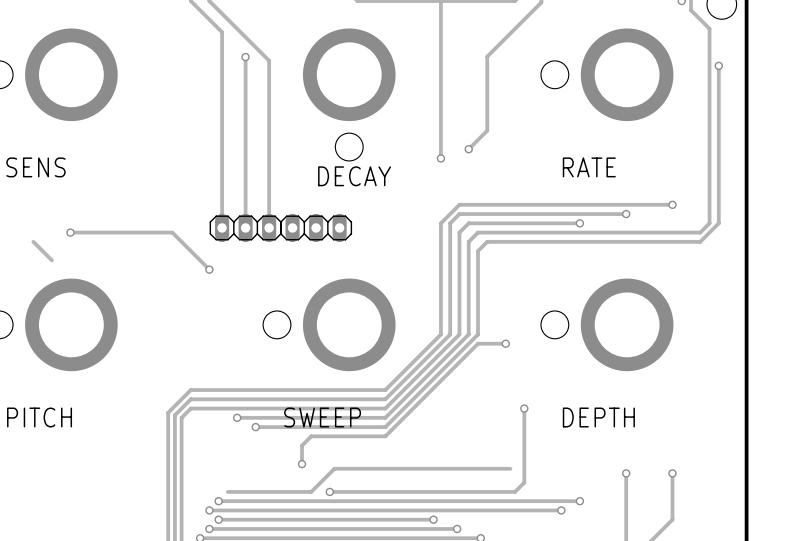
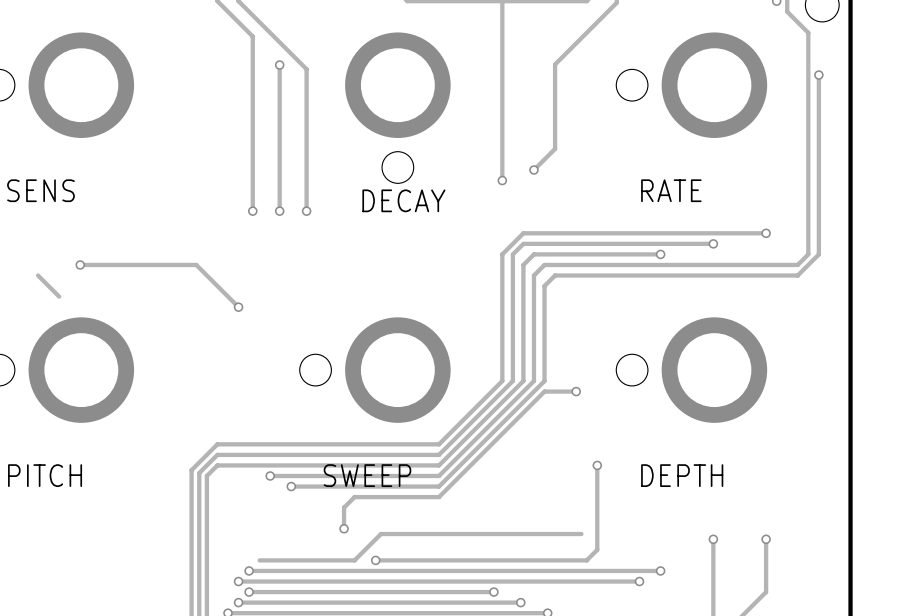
track: (222, 32) (222, 227) -> (252, 36) (252, 211)
track: (245, 57) (245, 227) -> (279, 65) (279, 211)
via: none -> (252, 211)
via: none -> (279, 211)
track: (269, 185) (269, 227) -> none
via: none -> (306, 211)
part: (245, 227) -> none
part: (316, 227) -> none

